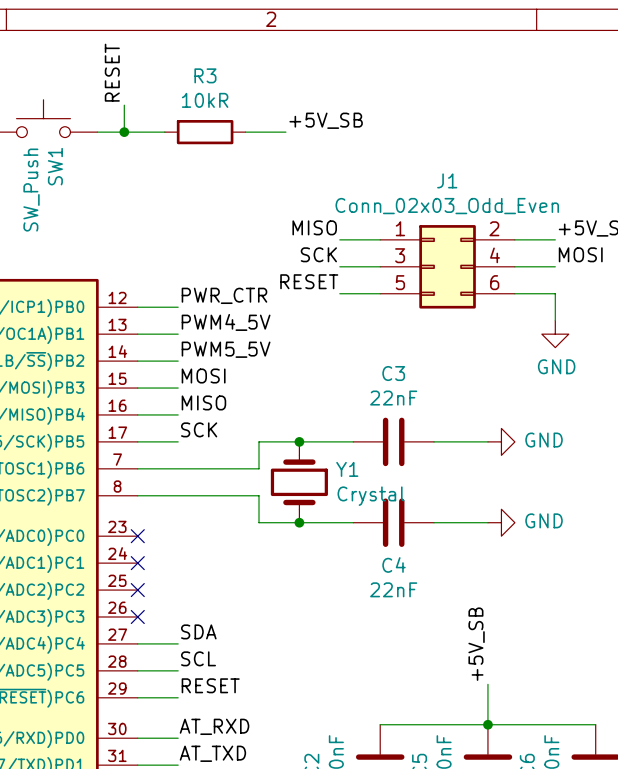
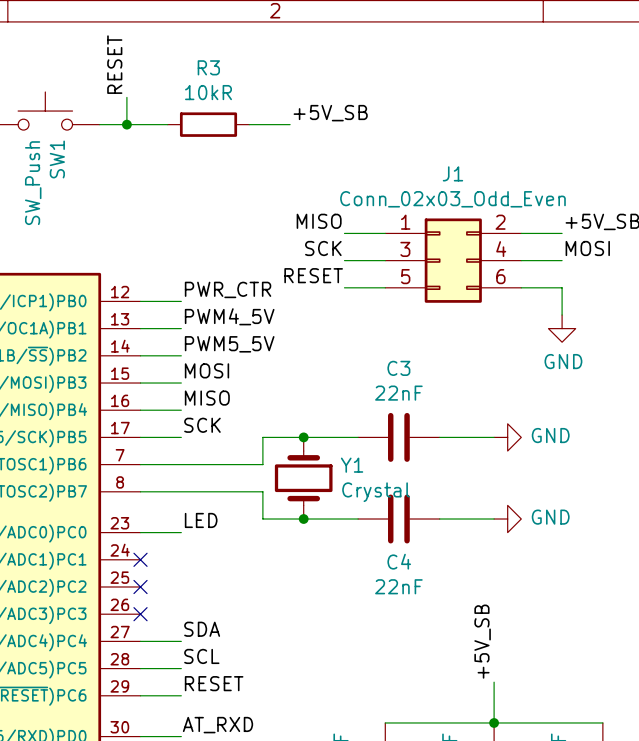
label: none -> LED (201, 520)
wire: none -> (140, 532) (181, 532)
no-connect mark: (137, 536) -> none

